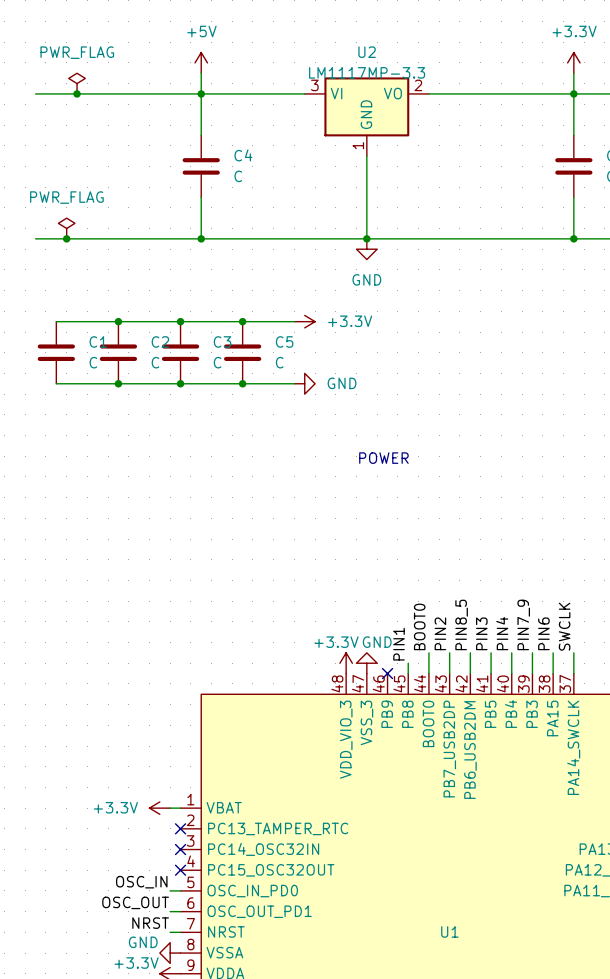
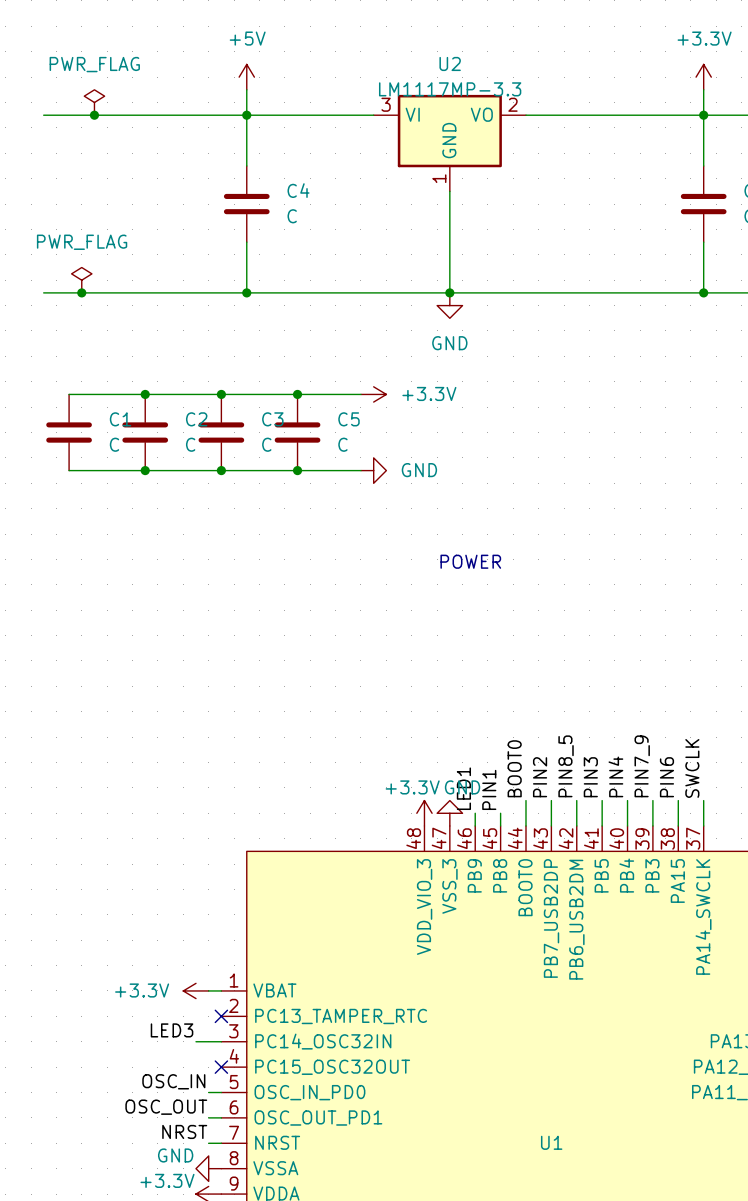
label: none -> LED1 (463, 788)
wire: none -> (475, 813) (475, 825)
no-connect mark: (387, 673) -> none
label: none -> LED3 (172, 1030)
wire: none -> (196, 1041) (221, 1041)
no-connect mark: (180, 849) -> none

